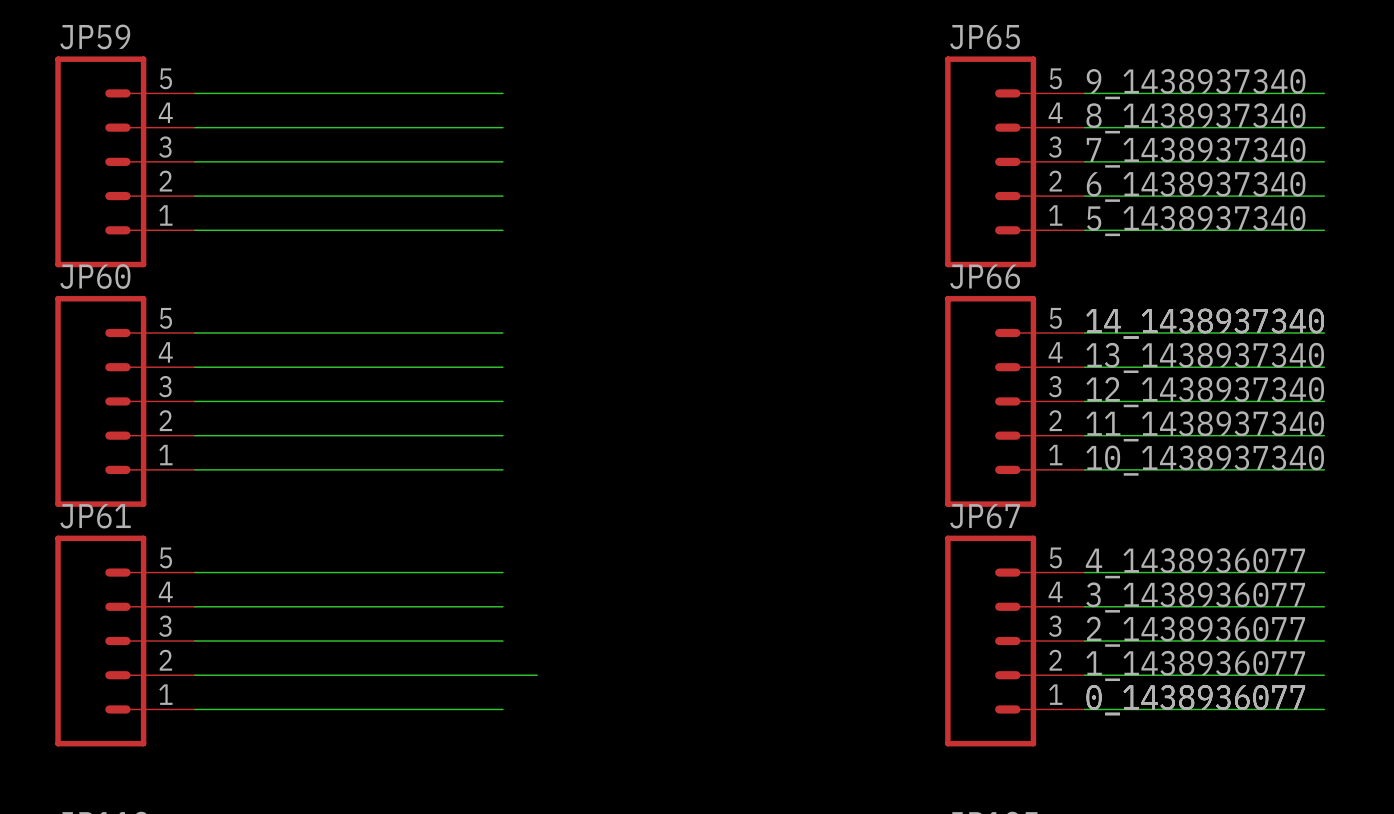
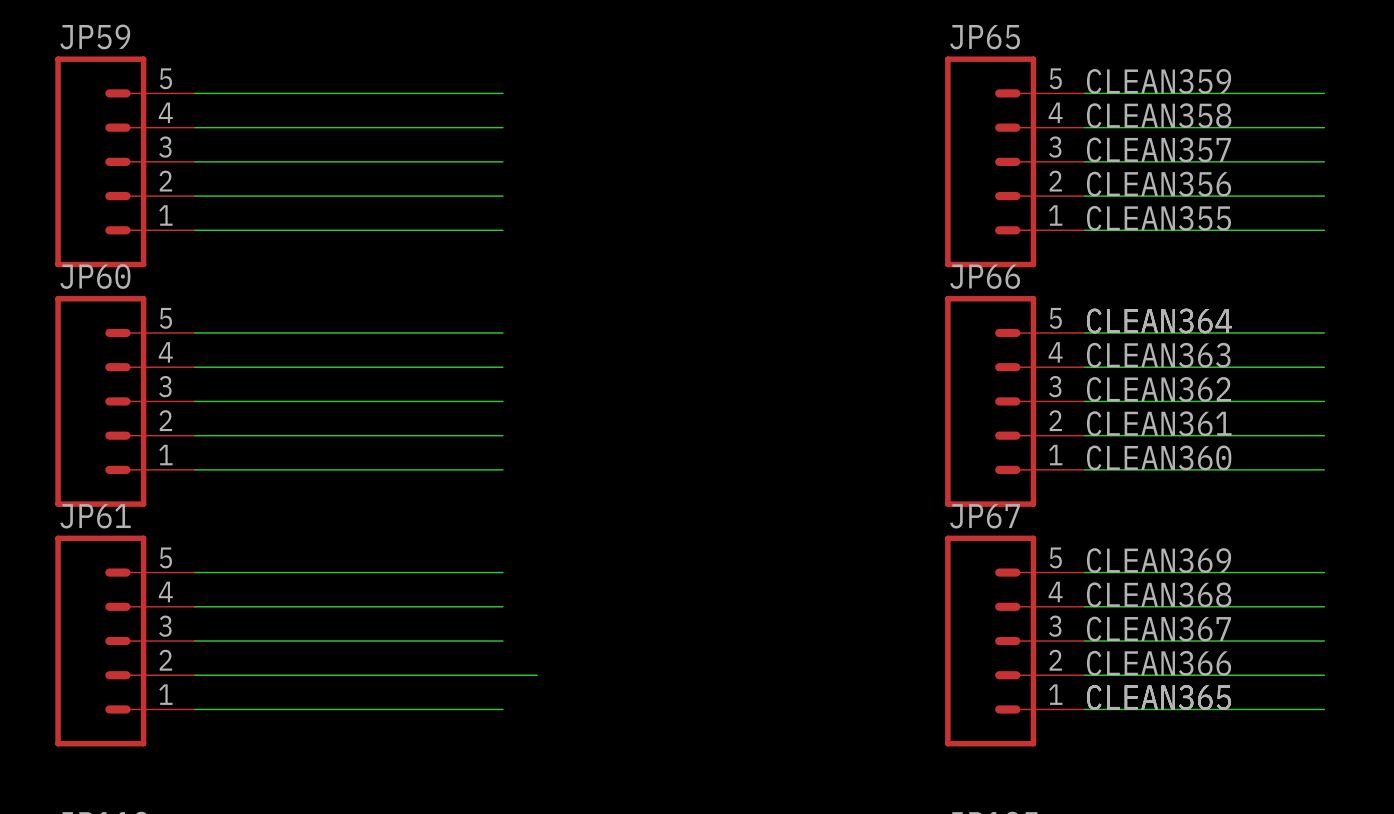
label: 9_1438937340 (1196, 84) -> CLEAN359 (1159, 81)
label: 8_1438937340 (1195, 118) -> CLEAN358 (1159, 115)
label: 7_1438937340 (1196, 152) -> CLEAN357 (1158, 149)
label: 6_1438937340 (1196, 186) -> CLEAN356 (1159, 184)
label: 5_1438937340 (1196, 221) -> CLEAN355 (1158, 218)
label: 14_1438937340 (1205, 323) -> CLEAN364 (1159, 321)
label: 13_1438937340 (1205, 357) -> CLEAN363 (1158, 355)
label: 12_1438937340 (1205, 392) -> CLEAN362 (1159, 389)
label: 11_1438937340 (1205, 426) -> CLEAN361 (1159, 423)
label: 10_1438937340 (1205, 460) -> CLEAN360 (1159, 457)
label: 4_1438936077 (1195, 563) -> CLEAN369 (1159, 560)
label: 3_1438936077 (1195, 597) -> CLEAN368 (1159, 594)
label: 2_1438936077 (1195, 631) -> CLEAN367 (1158, 629)
label: 1_1438936077 (1195, 665) -> CLEAN366 (1159, 663)
label: 0_1438936077 (1195, 700) -> CLEAN365 (1158, 697)

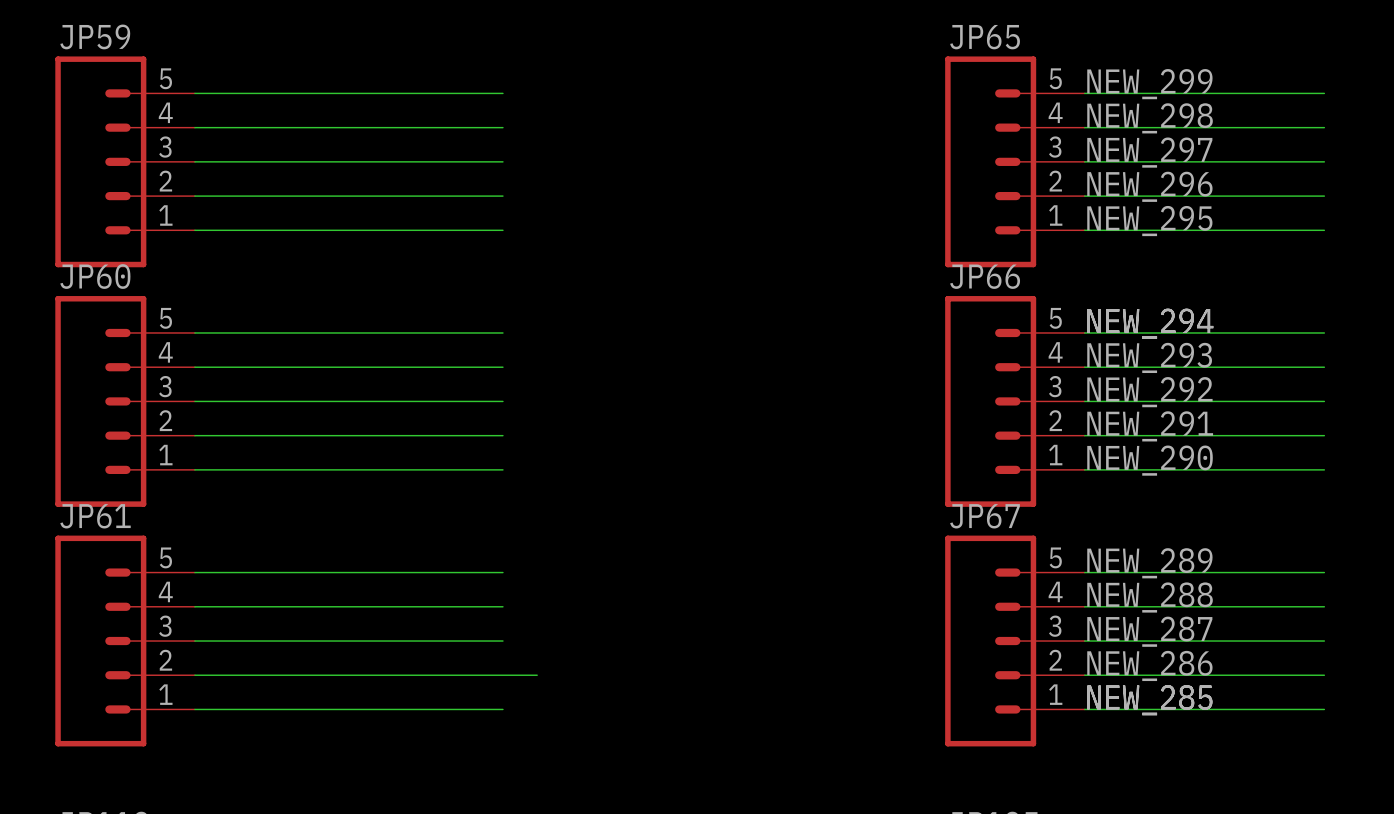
label: CLEAN359 (1159, 81) -> NEW_299 (1149, 84)
label: CLEAN358 (1159, 115) -> NEW_298 (1150, 118)
label: CLEAN357 (1158, 149) -> NEW_297 (1149, 152)
label: CLEAN356 (1159, 184) -> NEW_296 (1149, 186)
label: CLEAN355 (1158, 218) -> NEW_295 (1149, 221)
label: CLEAN364 (1159, 321) -> NEW_294 (1150, 323)
label: CLEAN363 (1158, 355) -> NEW_293 (1149, 357)
label: CLEAN362 (1159, 389) -> NEW_292 (1149, 392)
label: CLEAN361 (1159, 423) -> NEW_291 (1150, 426)
label: CLEAN360 (1159, 457) -> NEW_290 (1150, 460)
label: CLEAN369 (1159, 560) -> NEW_289 (1149, 563)
label: CLEAN368 (1159, 594) -> NEW_288 (1150, 597)
label: CLEAN367 (1158, 629) -> NEW_287 (1149, 631)
label: CLEAN366 (1159, 663) -> NEW_286 (1149, 665)
label: CLEAN365 (1158, 697) -> NEW_285 (1149, 700)

